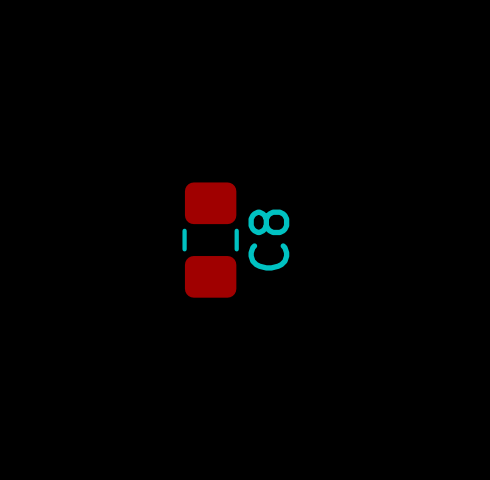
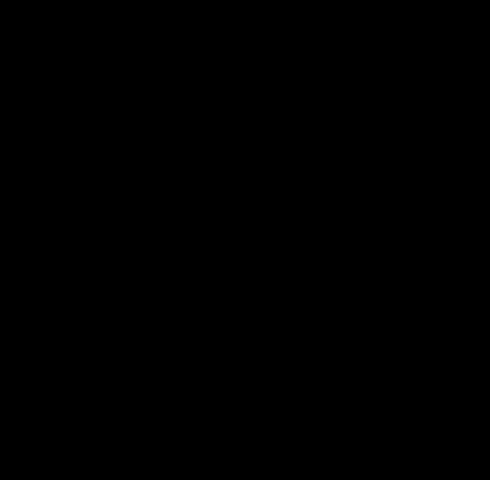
C8: (210, 240) -> none

